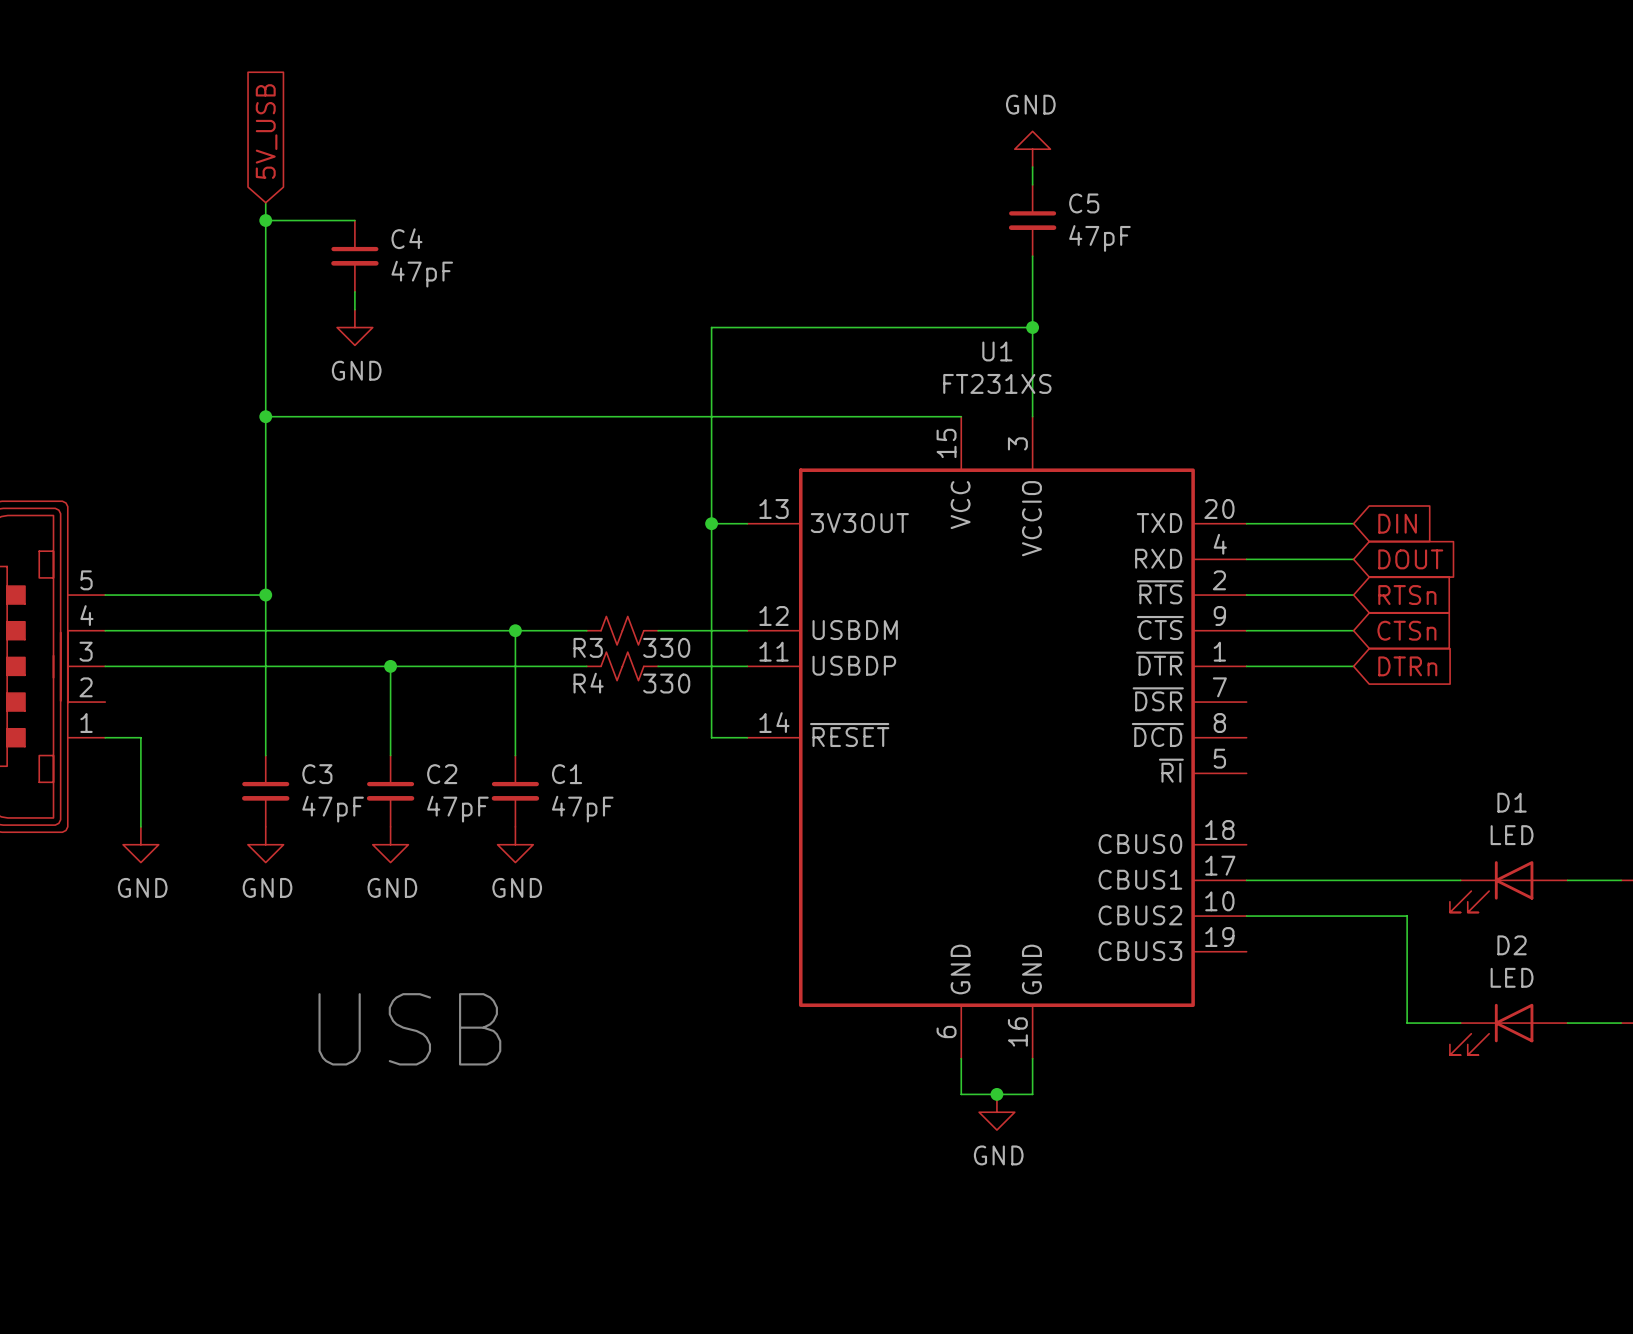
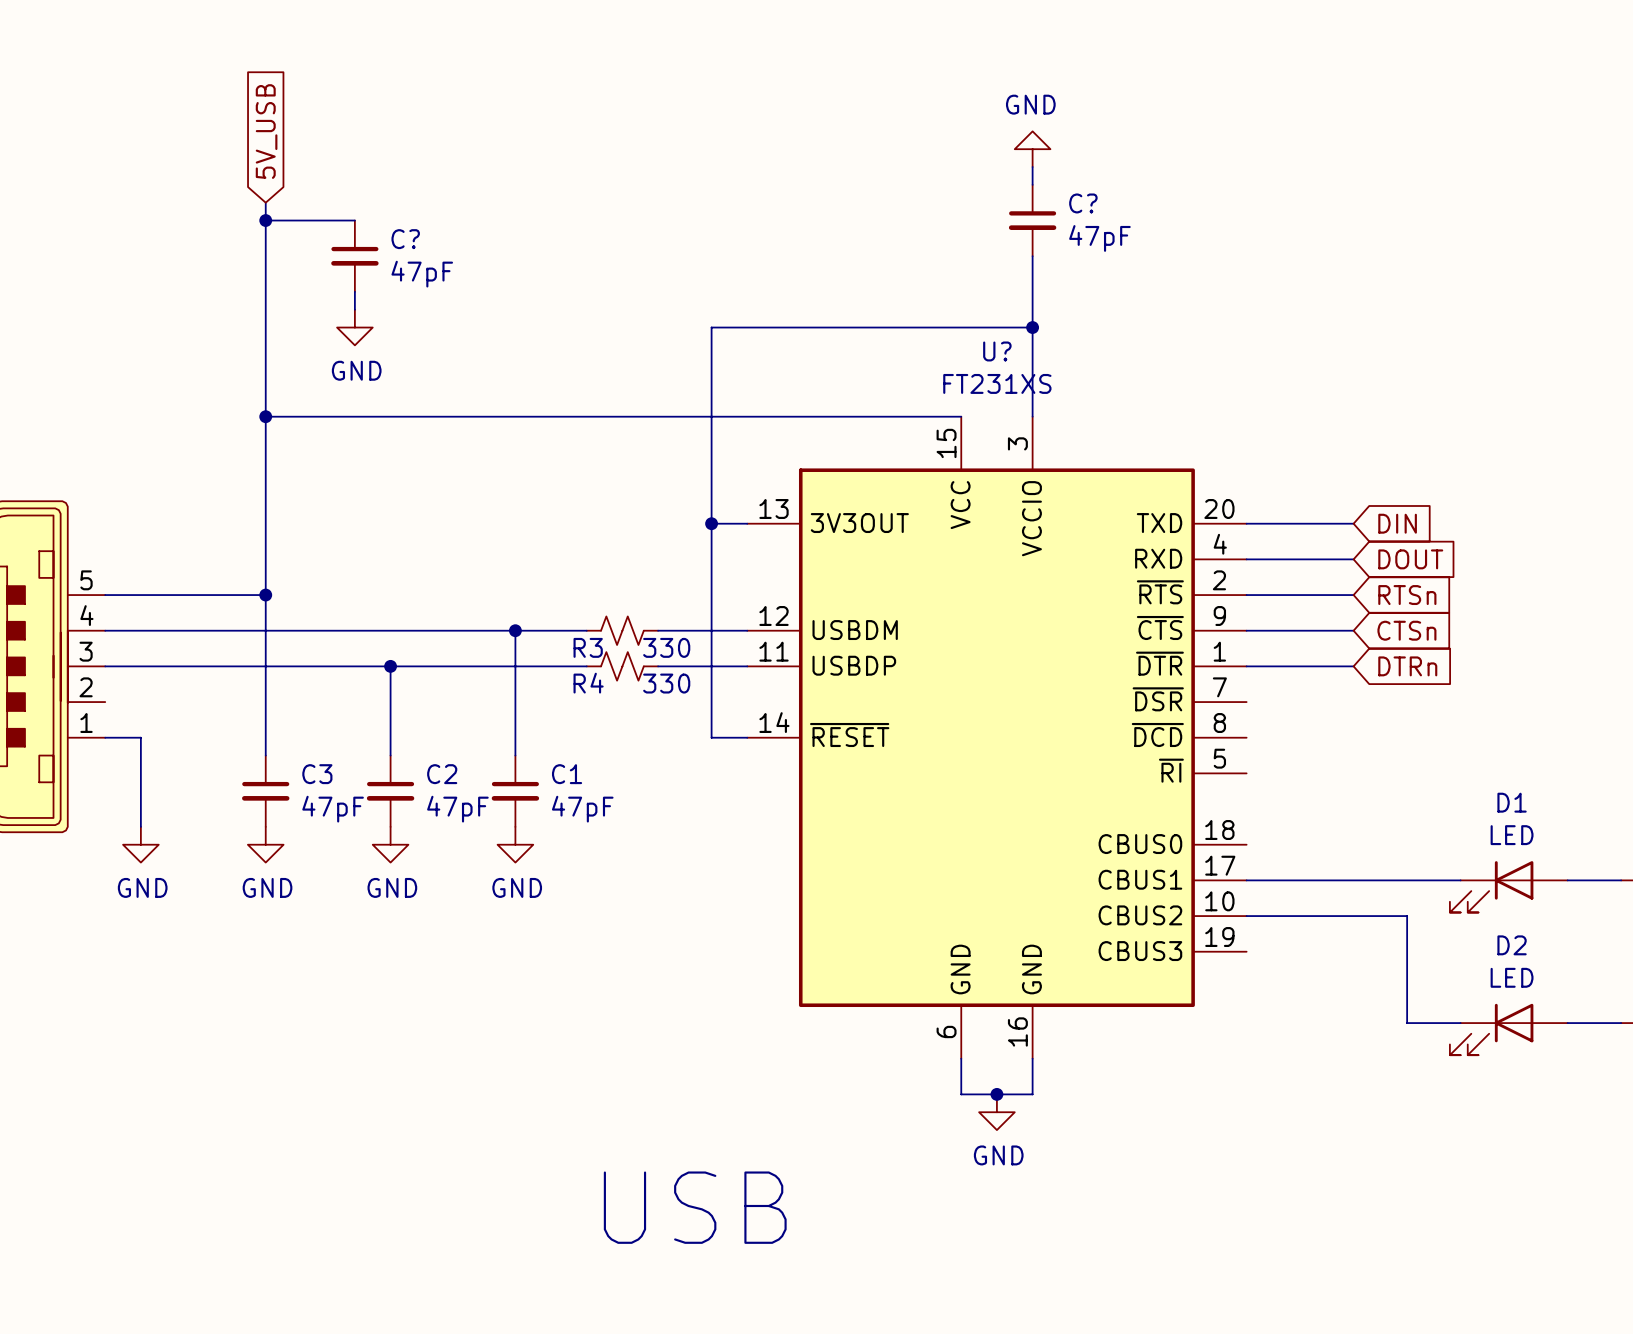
C5 name: C5 (1084, 203) -> C? (1083, 203)
C4 name: C4 (406, 238) -> C? (405, 239)
U1 name: U1 (997, 351) -> U? (997, 351)
text position: USB (409, 1029) -> USB (695, 1207)

